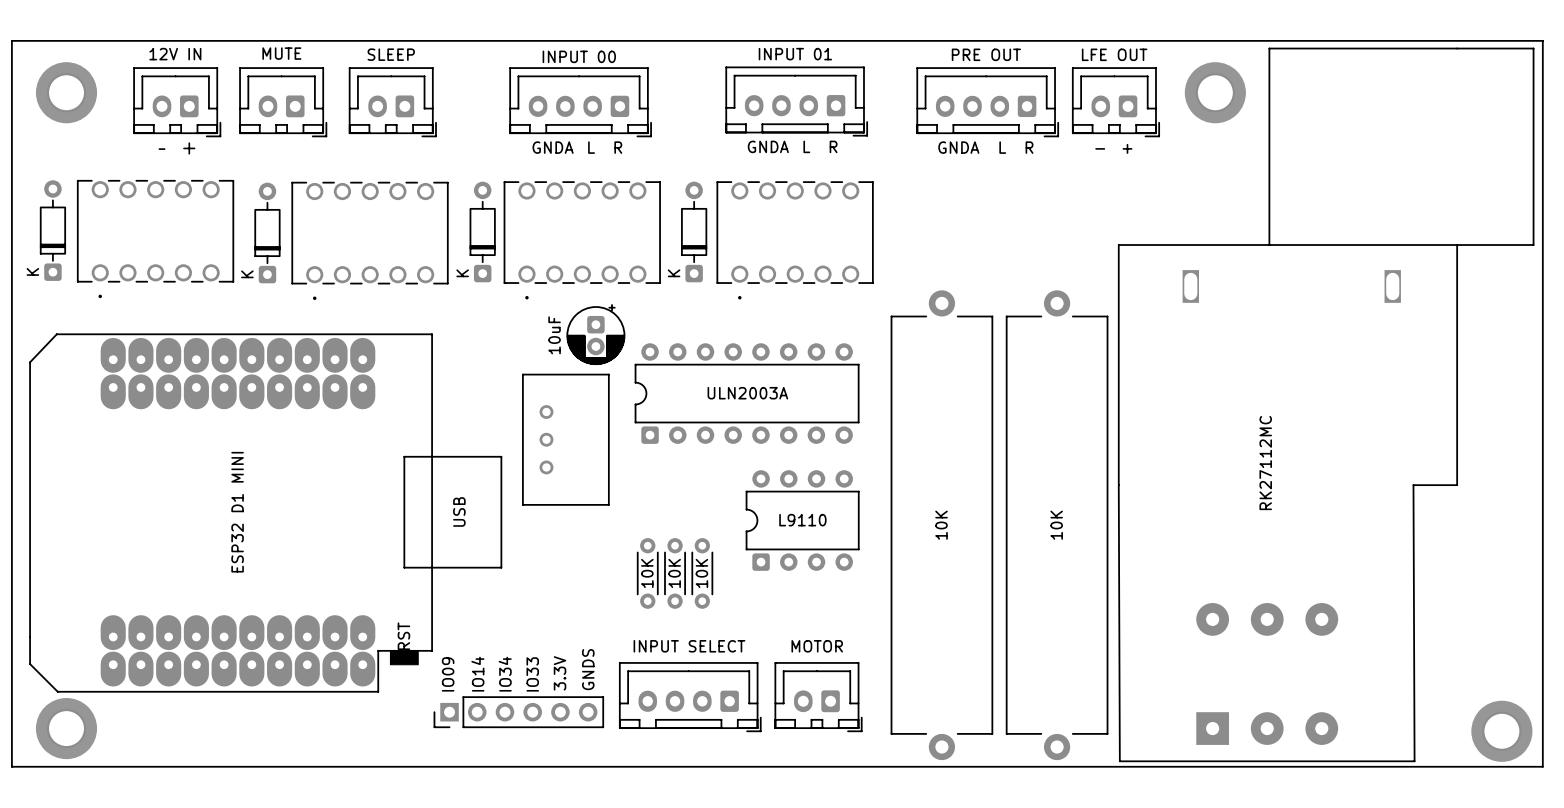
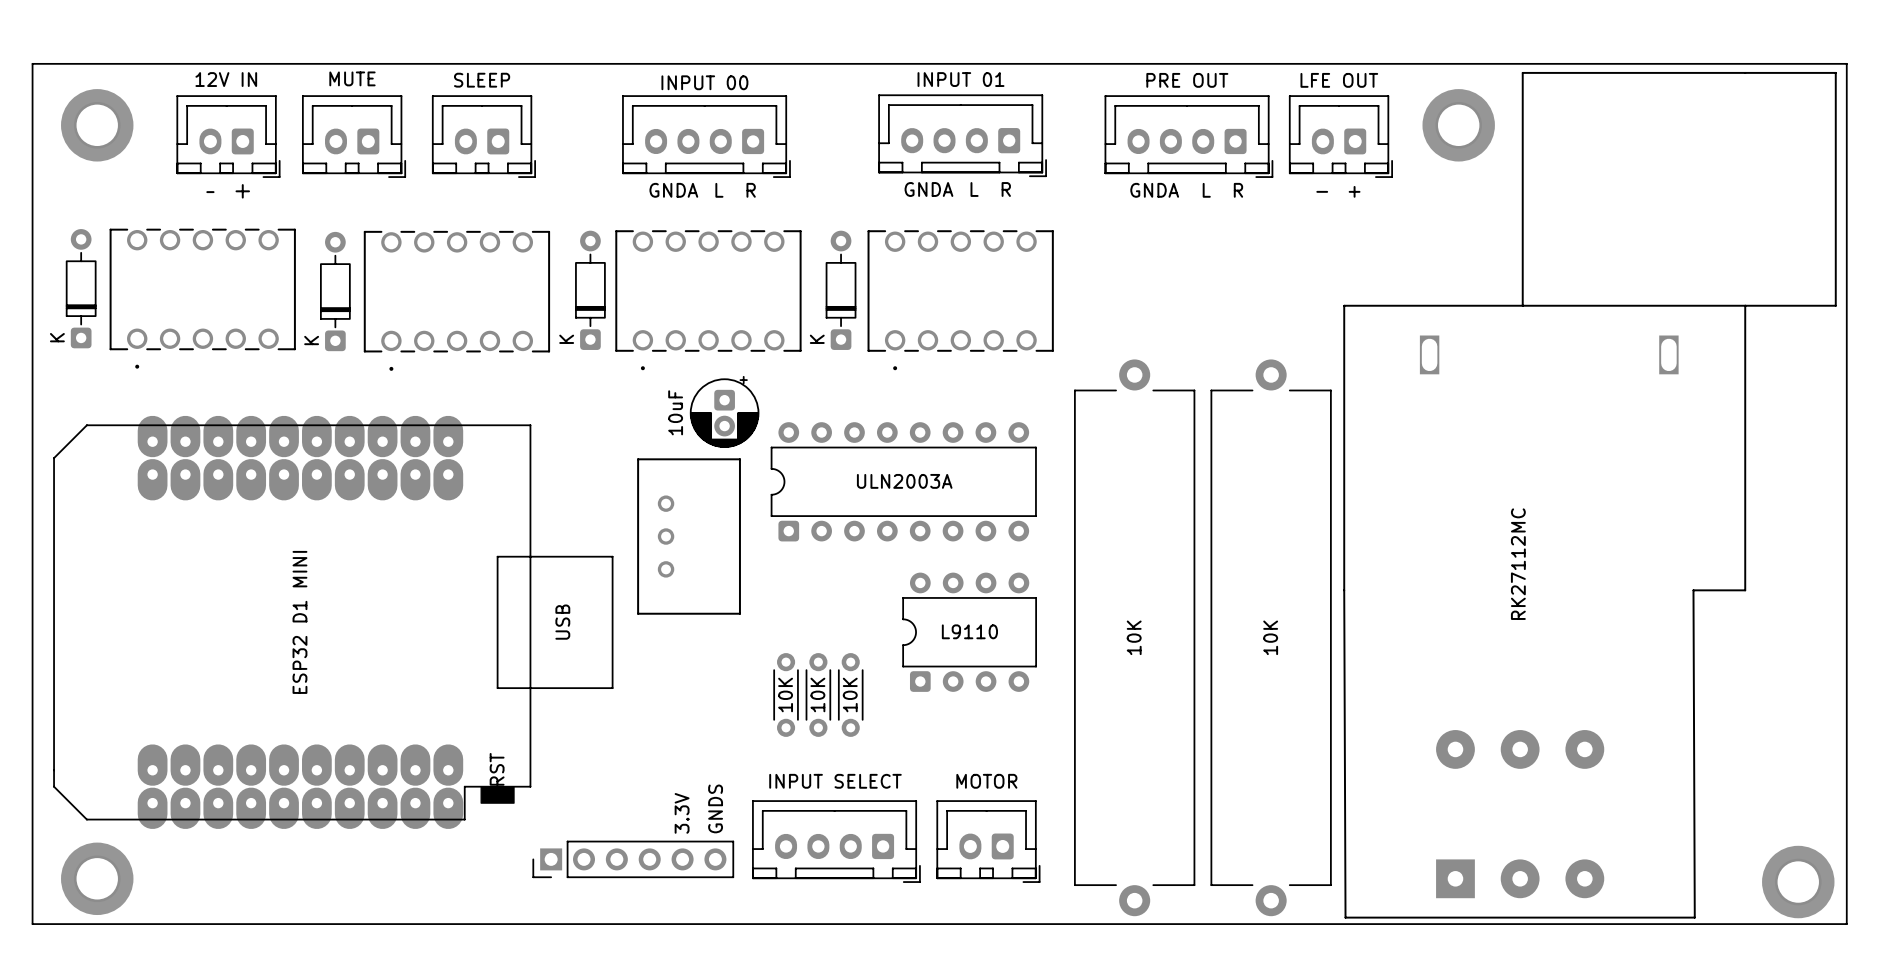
part footprint: [29, 333, 503, 693] -> [53, 415, 614, 830]
text: IO09 (448, 674) -> none
text: IO14 (477, 674) -> none
text: IO34 (505, 674) -> none
text: IO33 (532, 674) -> none

